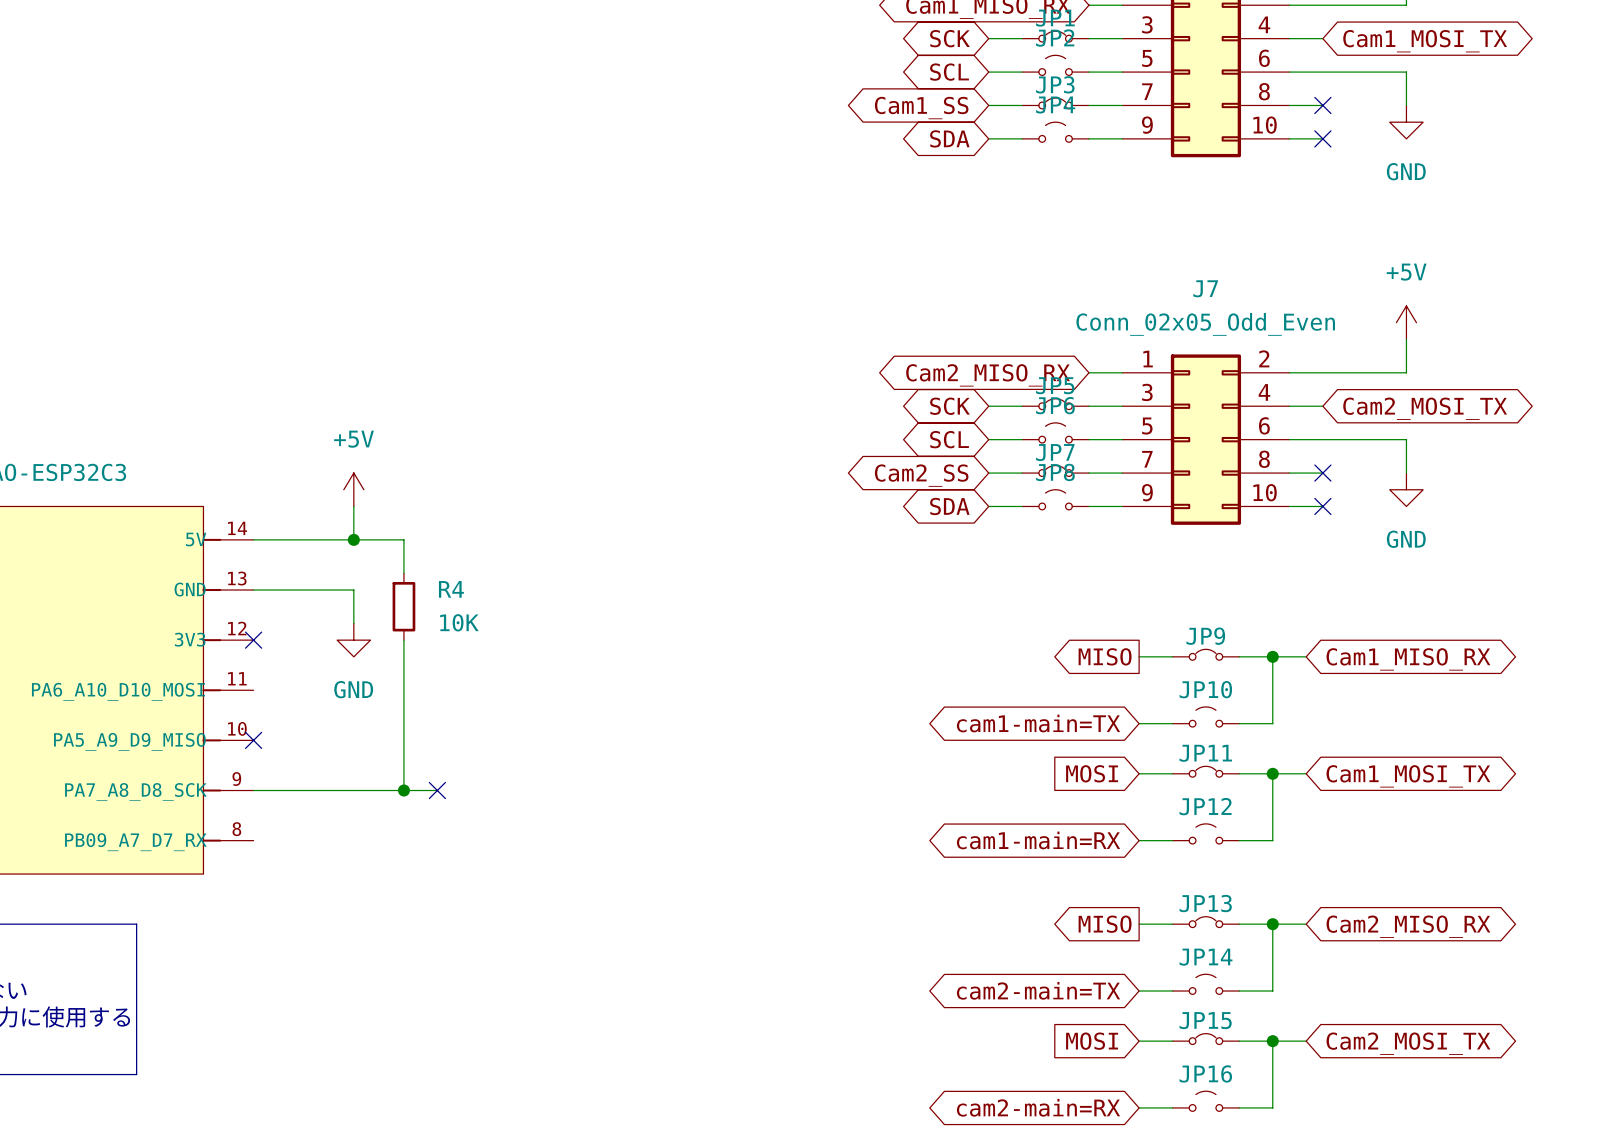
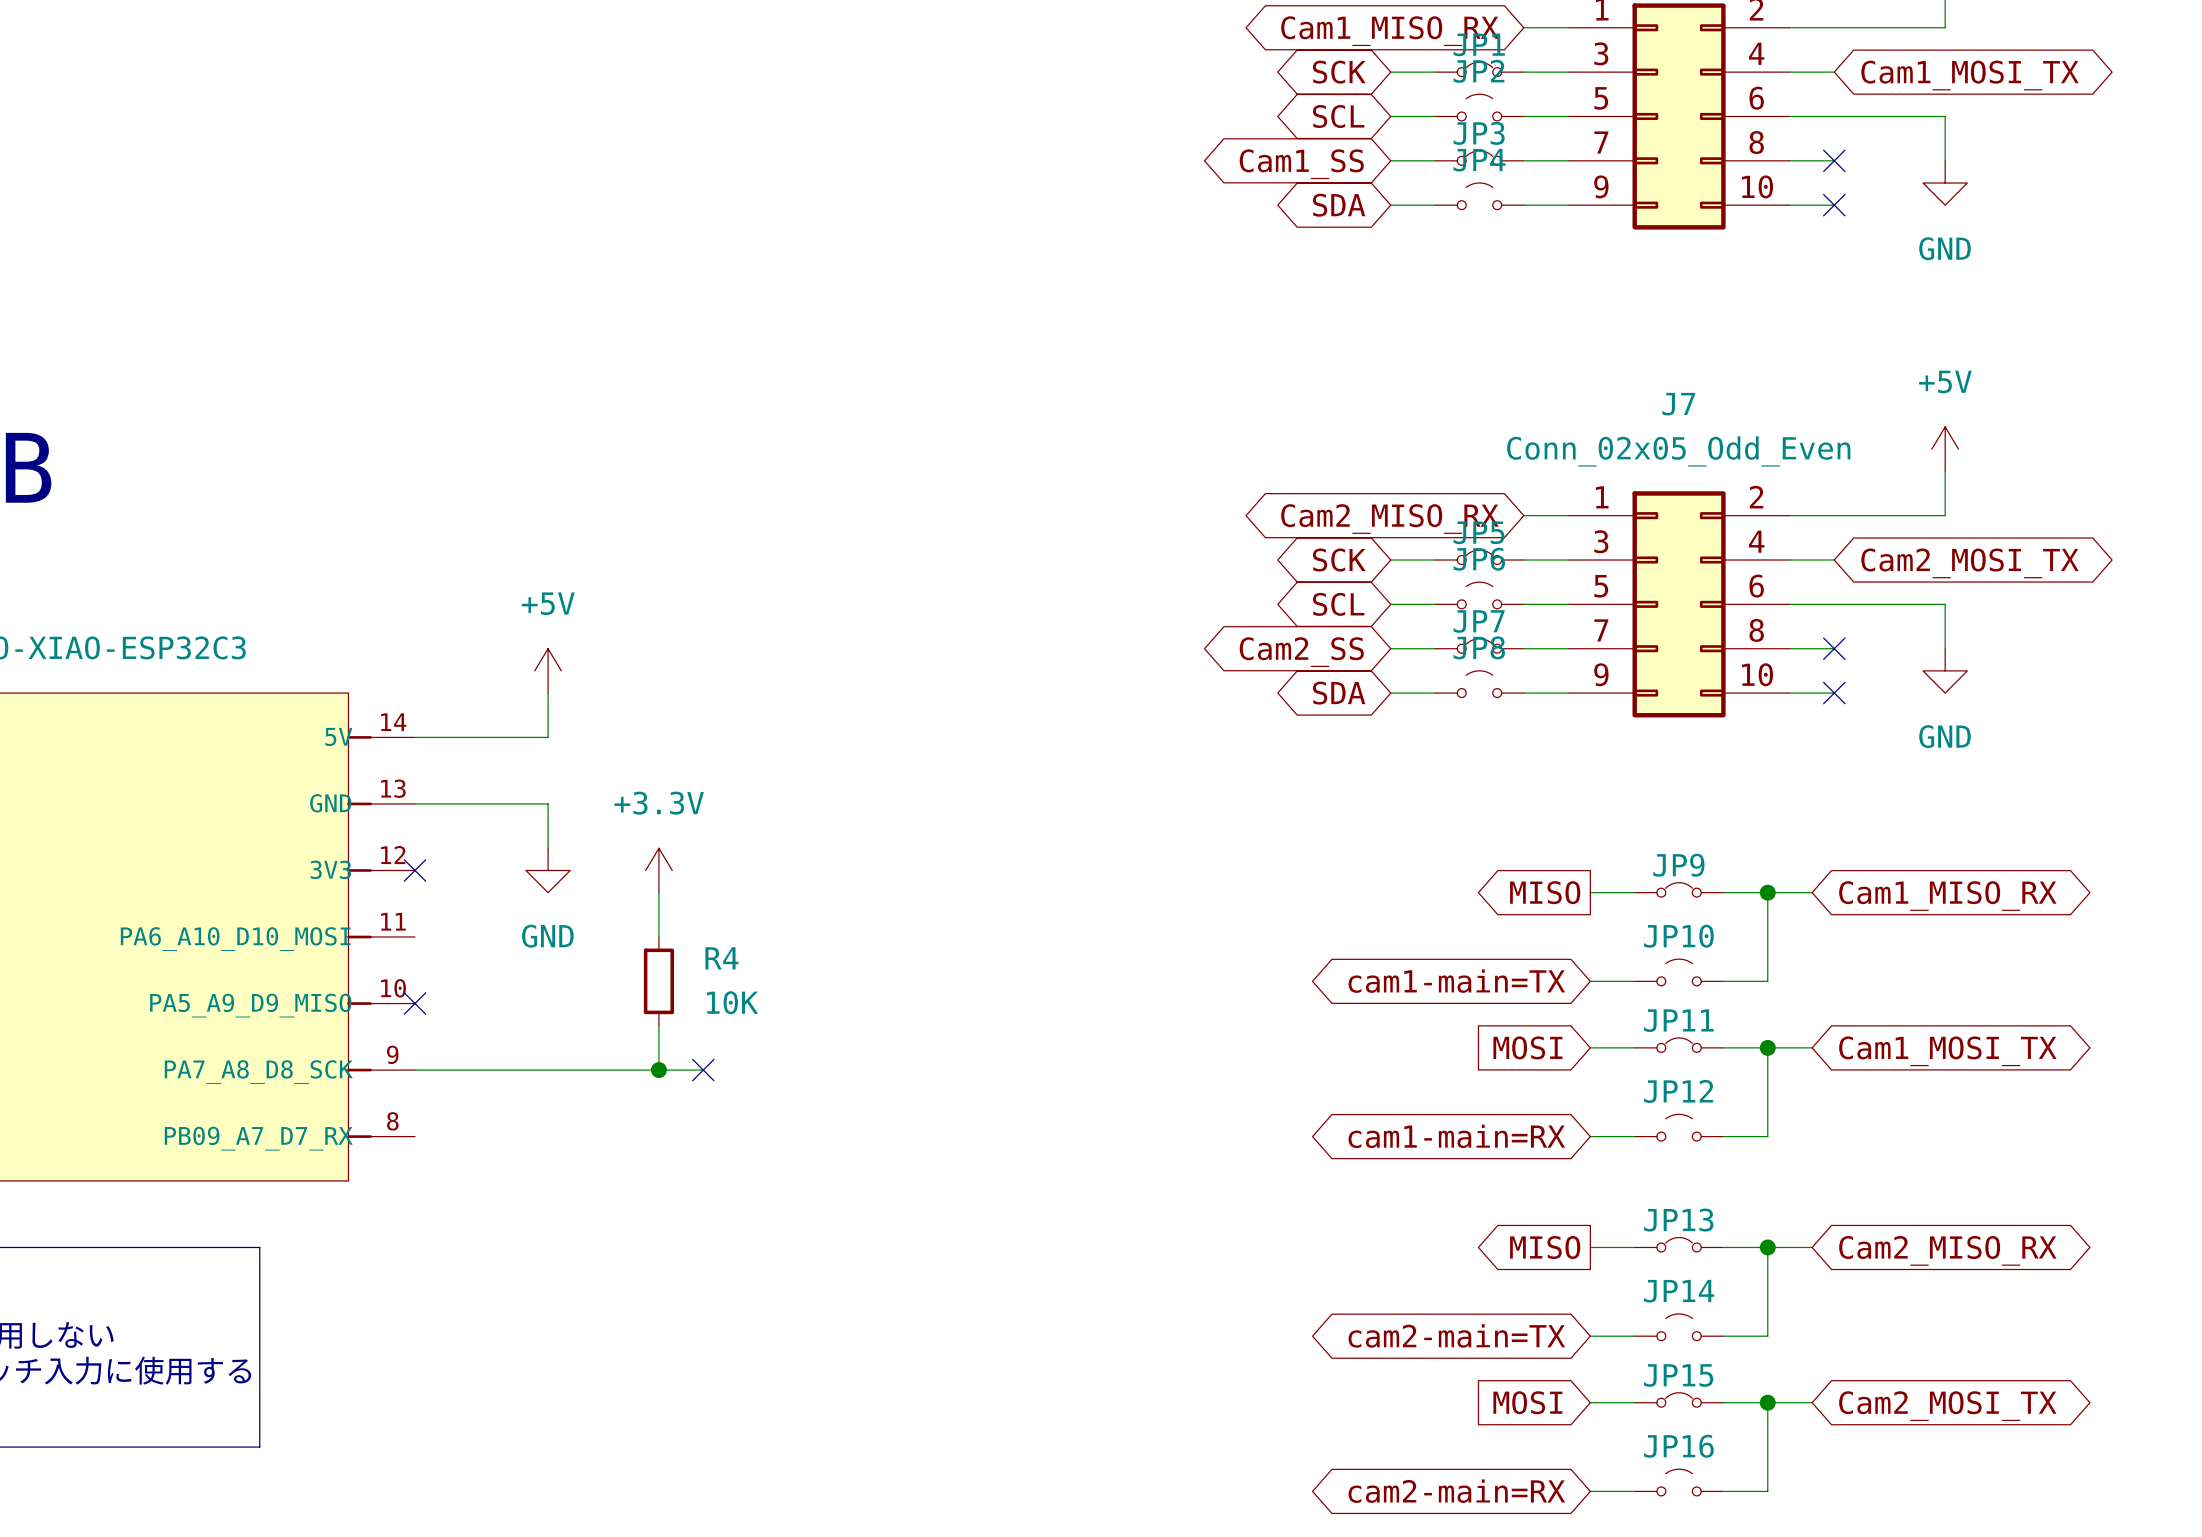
wire: (353, 539) (403, 539) (403, 573) -> none
junction: (353, 539) -> none
R4 position: (403, 606) -> (658, 981)
wire: (403, 640) (403, 790) -> none
power symbol: none -> +3.3V (658, 870)
wire: none -> (658, 892) (658, 937)
wire: none -> (658, 1025) (658, 1070) (703, 1070)
junction position: (403, 790) -> (658, 1070)
no-connect mark position: (437, 790) -> (703, 1070)

